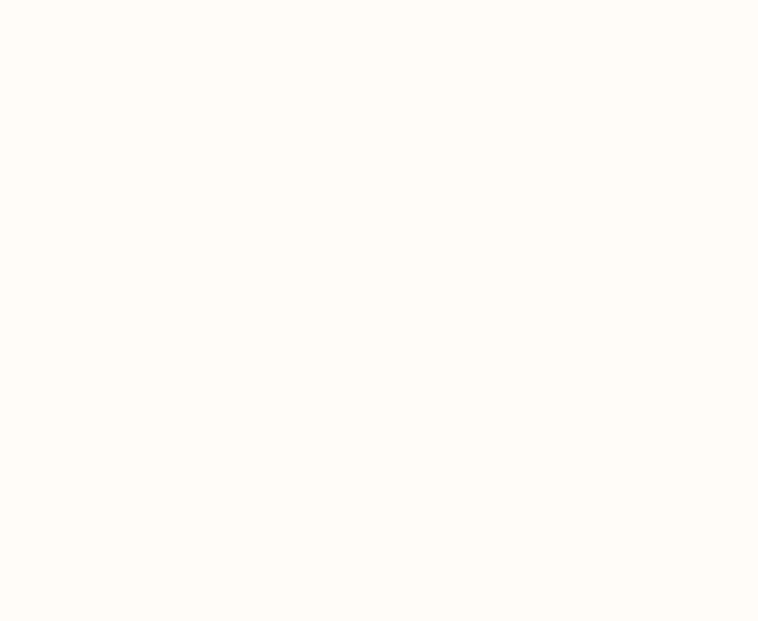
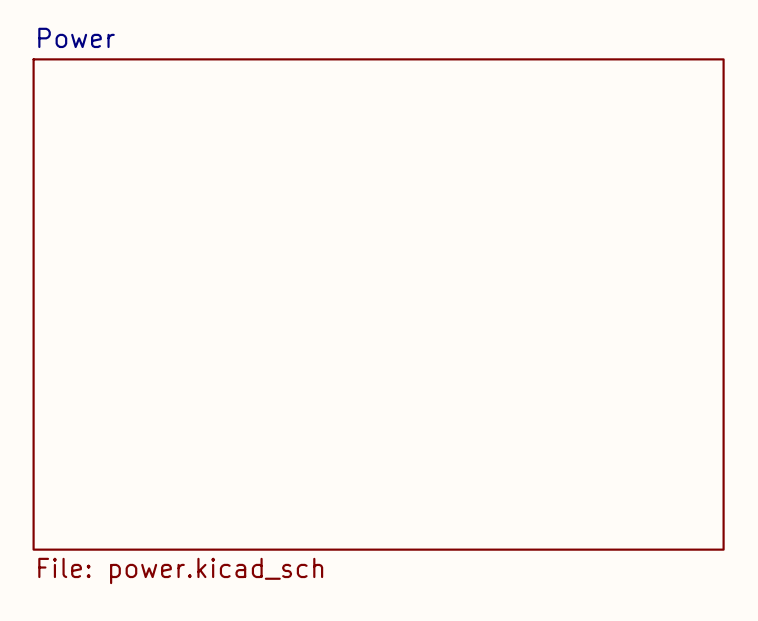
sheet Power: none -> File: power.kicad_sch (378, 304)

